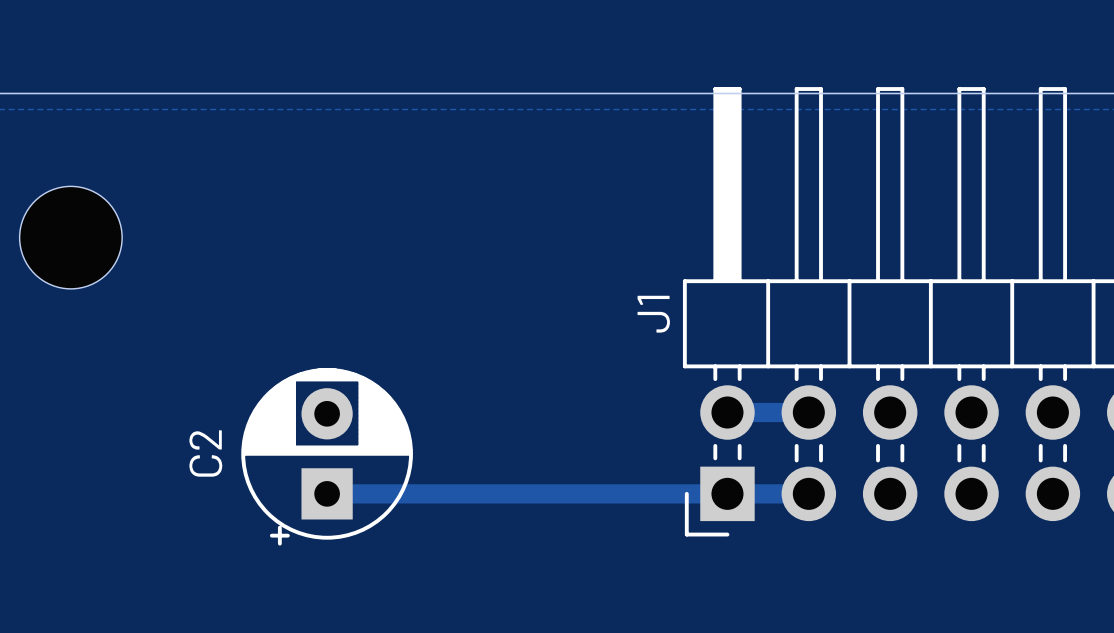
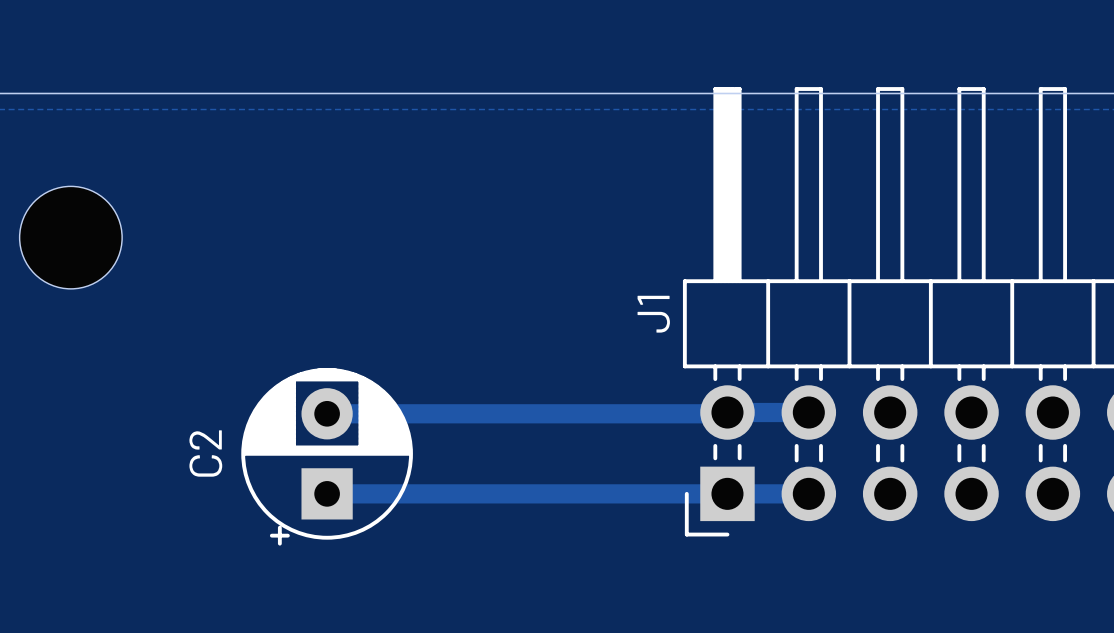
track: none -> (727, 412) (327, 413)

